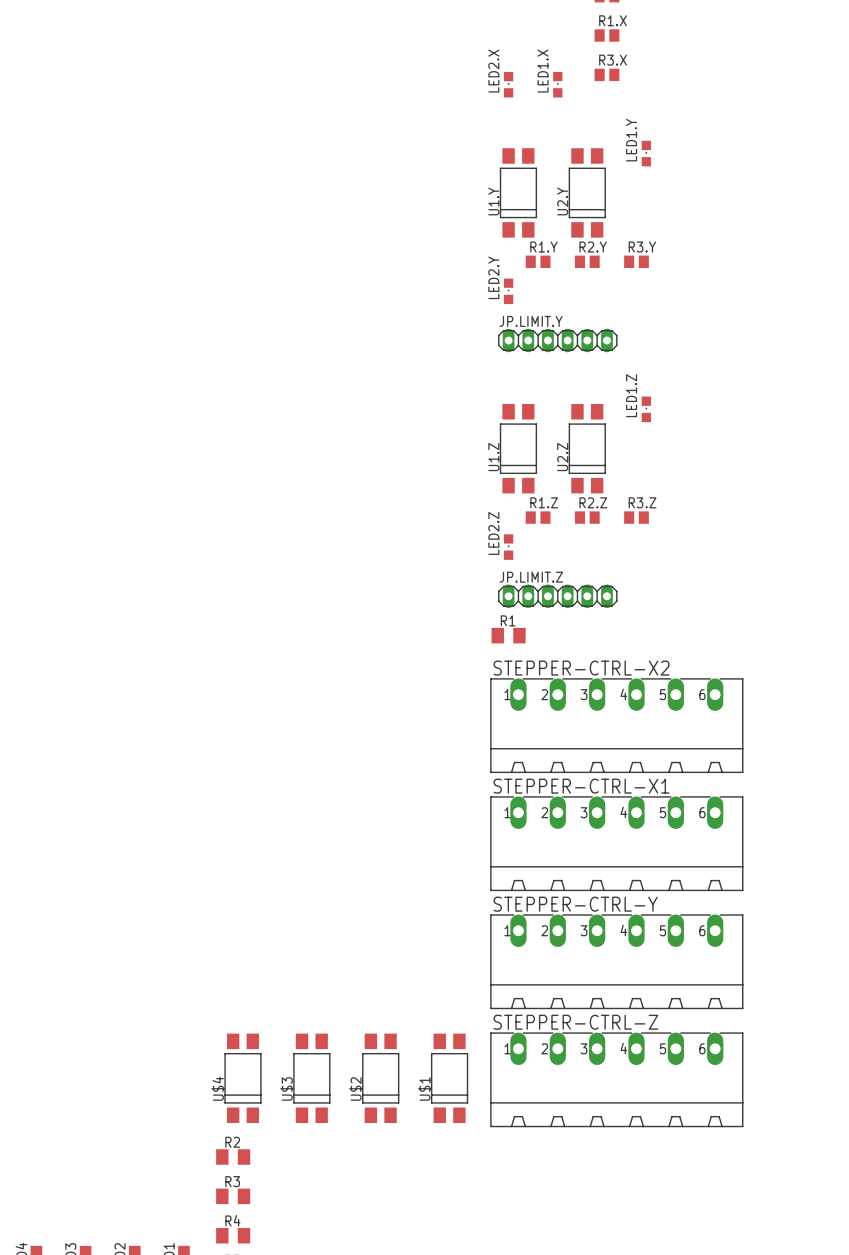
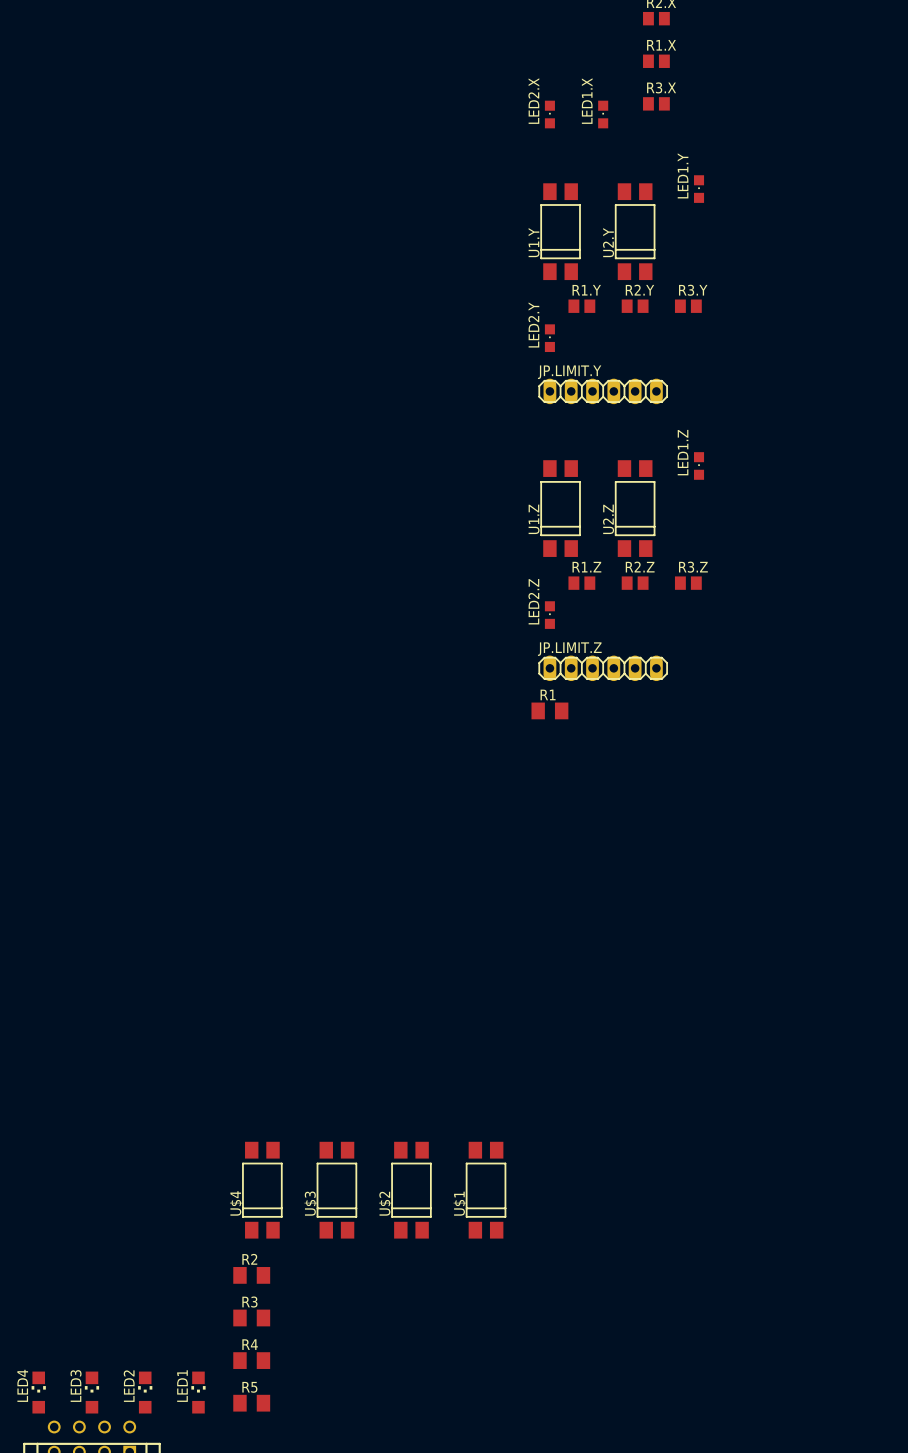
STEPPER-CTRL-X2: (616, 725) -> none
STEPPER-CTRL-X1: (616, 843) -> none
STEPPER-CTRL-Y: (616, 961) -> none
STEPPER-CTRL-Z: (616, 1079) -> none

